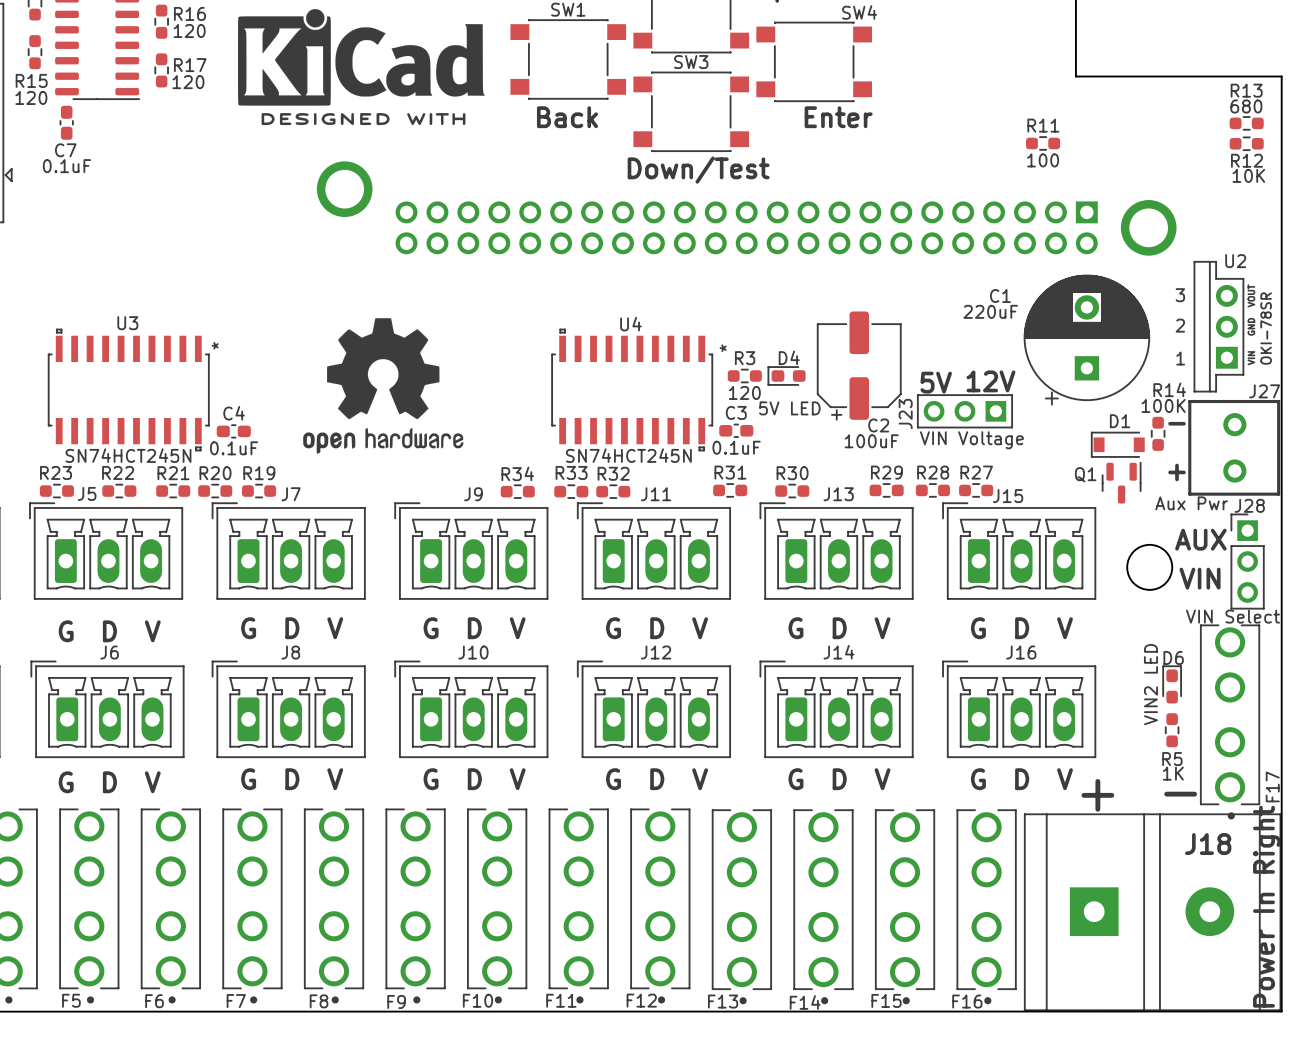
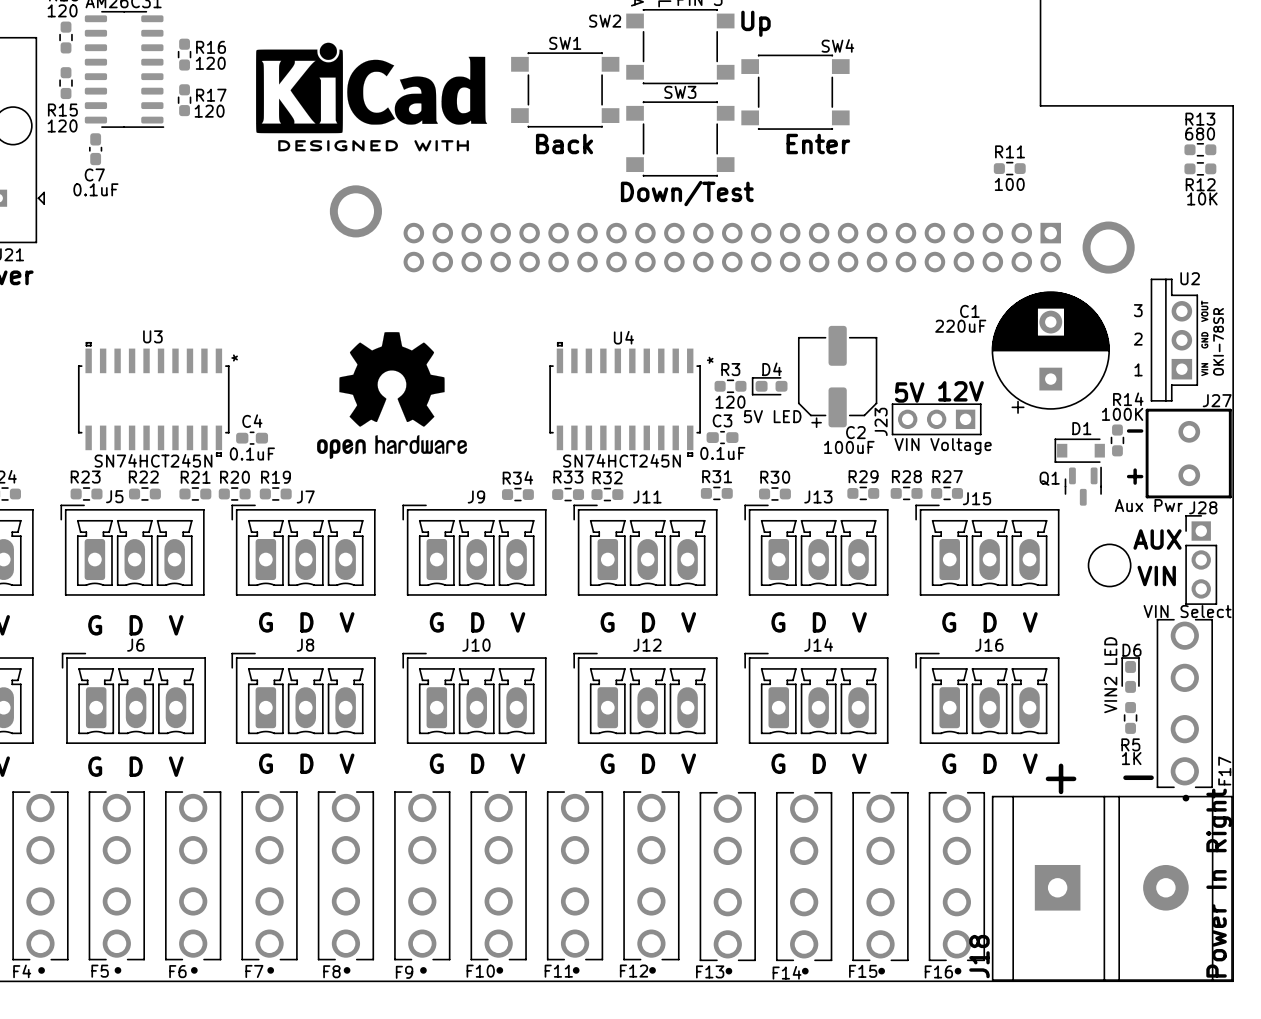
J18 name rotation: 0° (1208, 844) -> 90° counterclockwise (979, 956)
J18 name position: J18 (1208, 844) -> J18 (979, 956)

